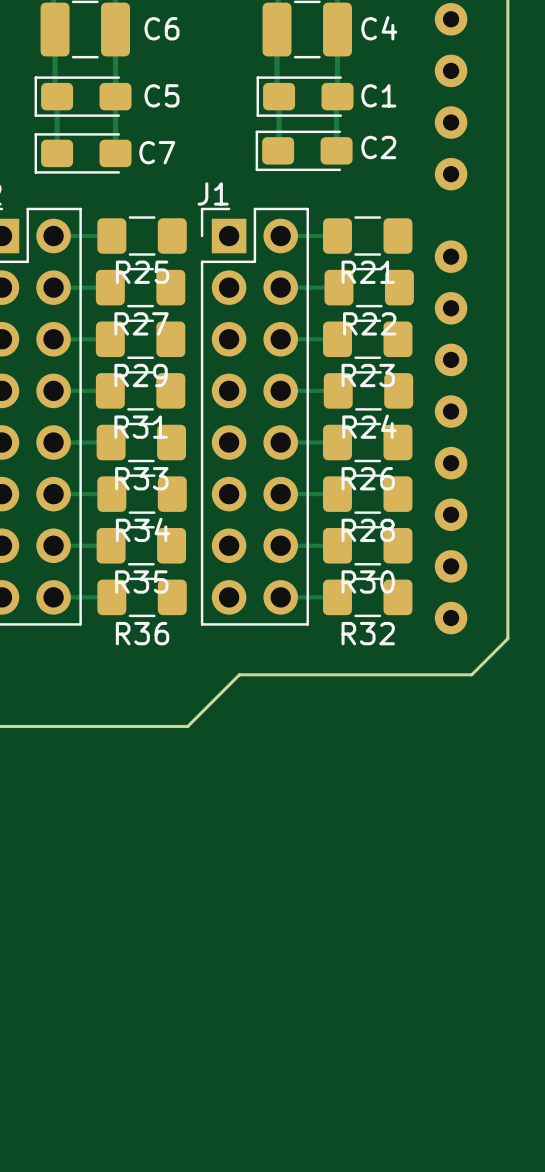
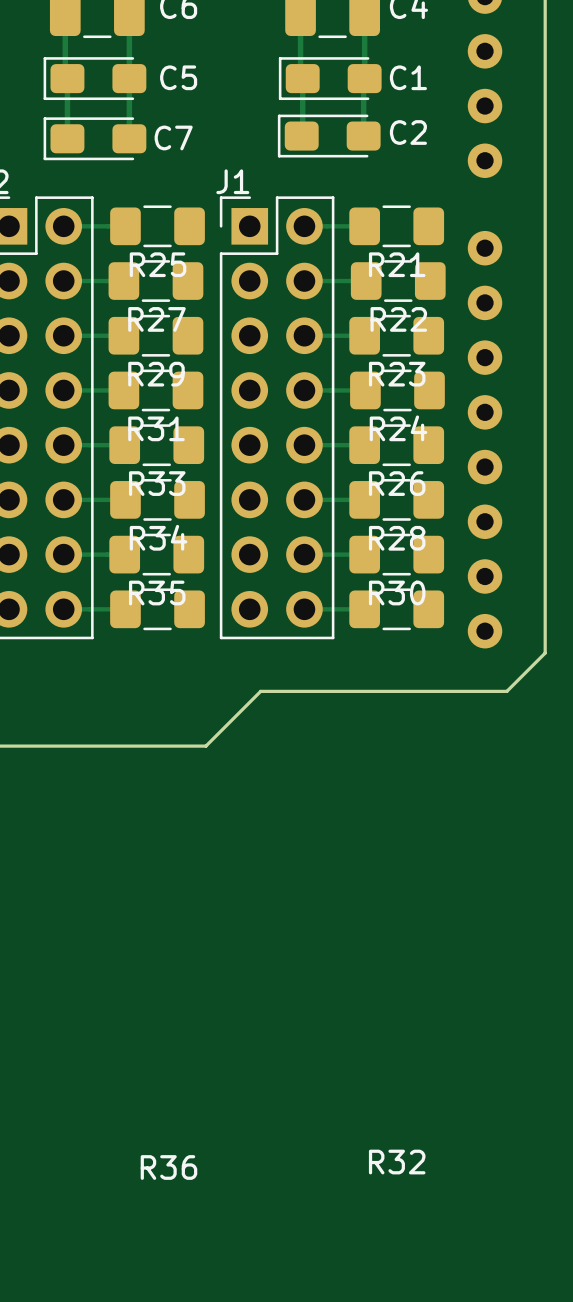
R36 name position: R36 (142, 633) -> R36 (168, 1167)
R32 name position: R32 (368, 633) -> R32 (397, 1162)

